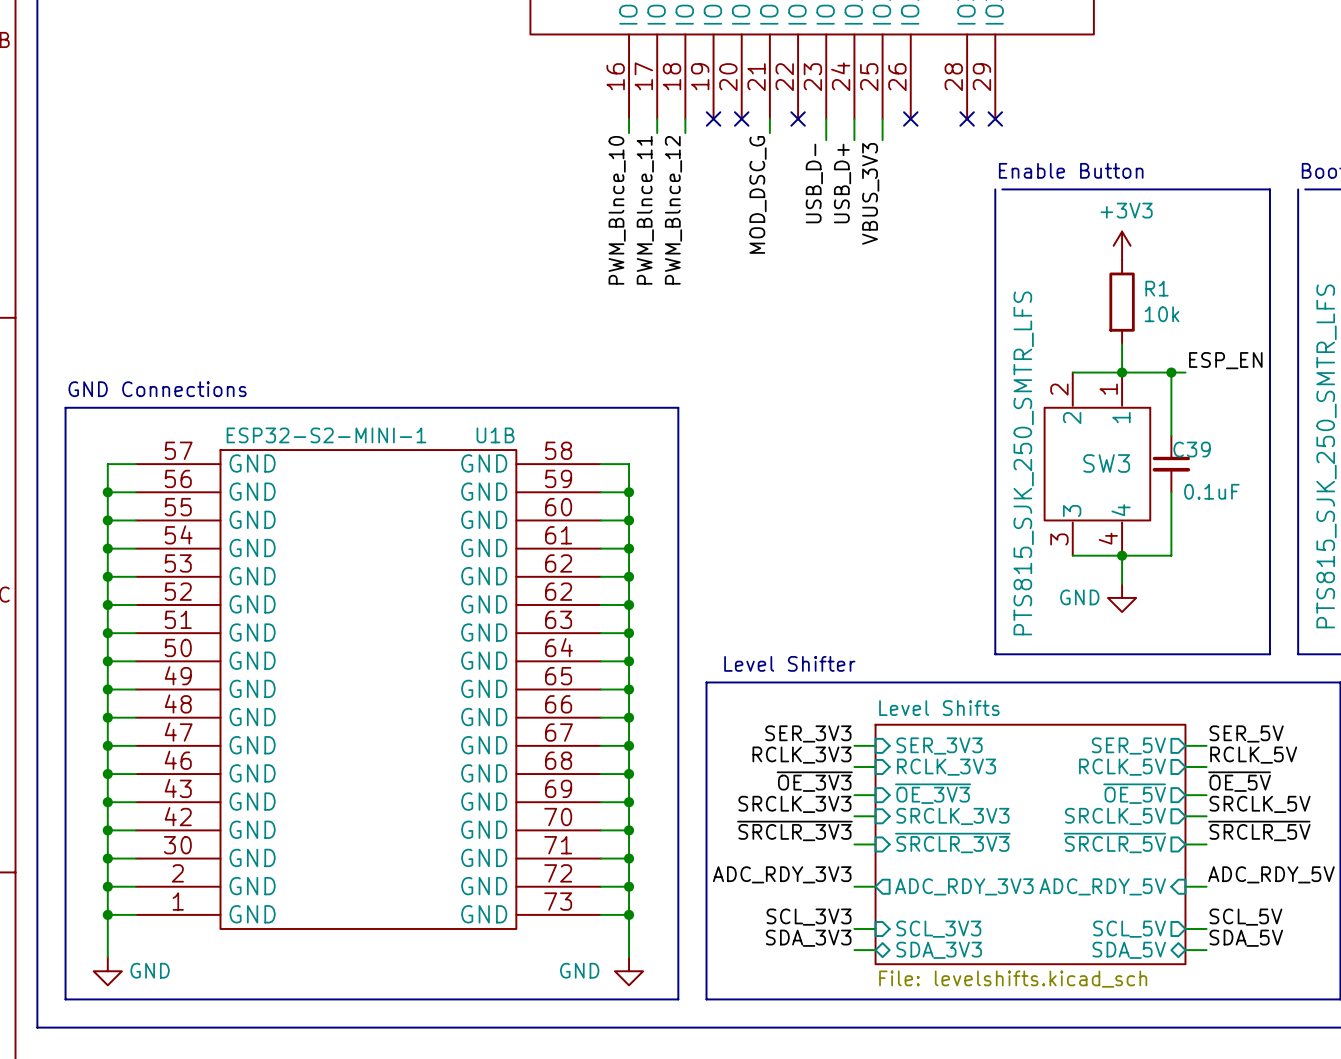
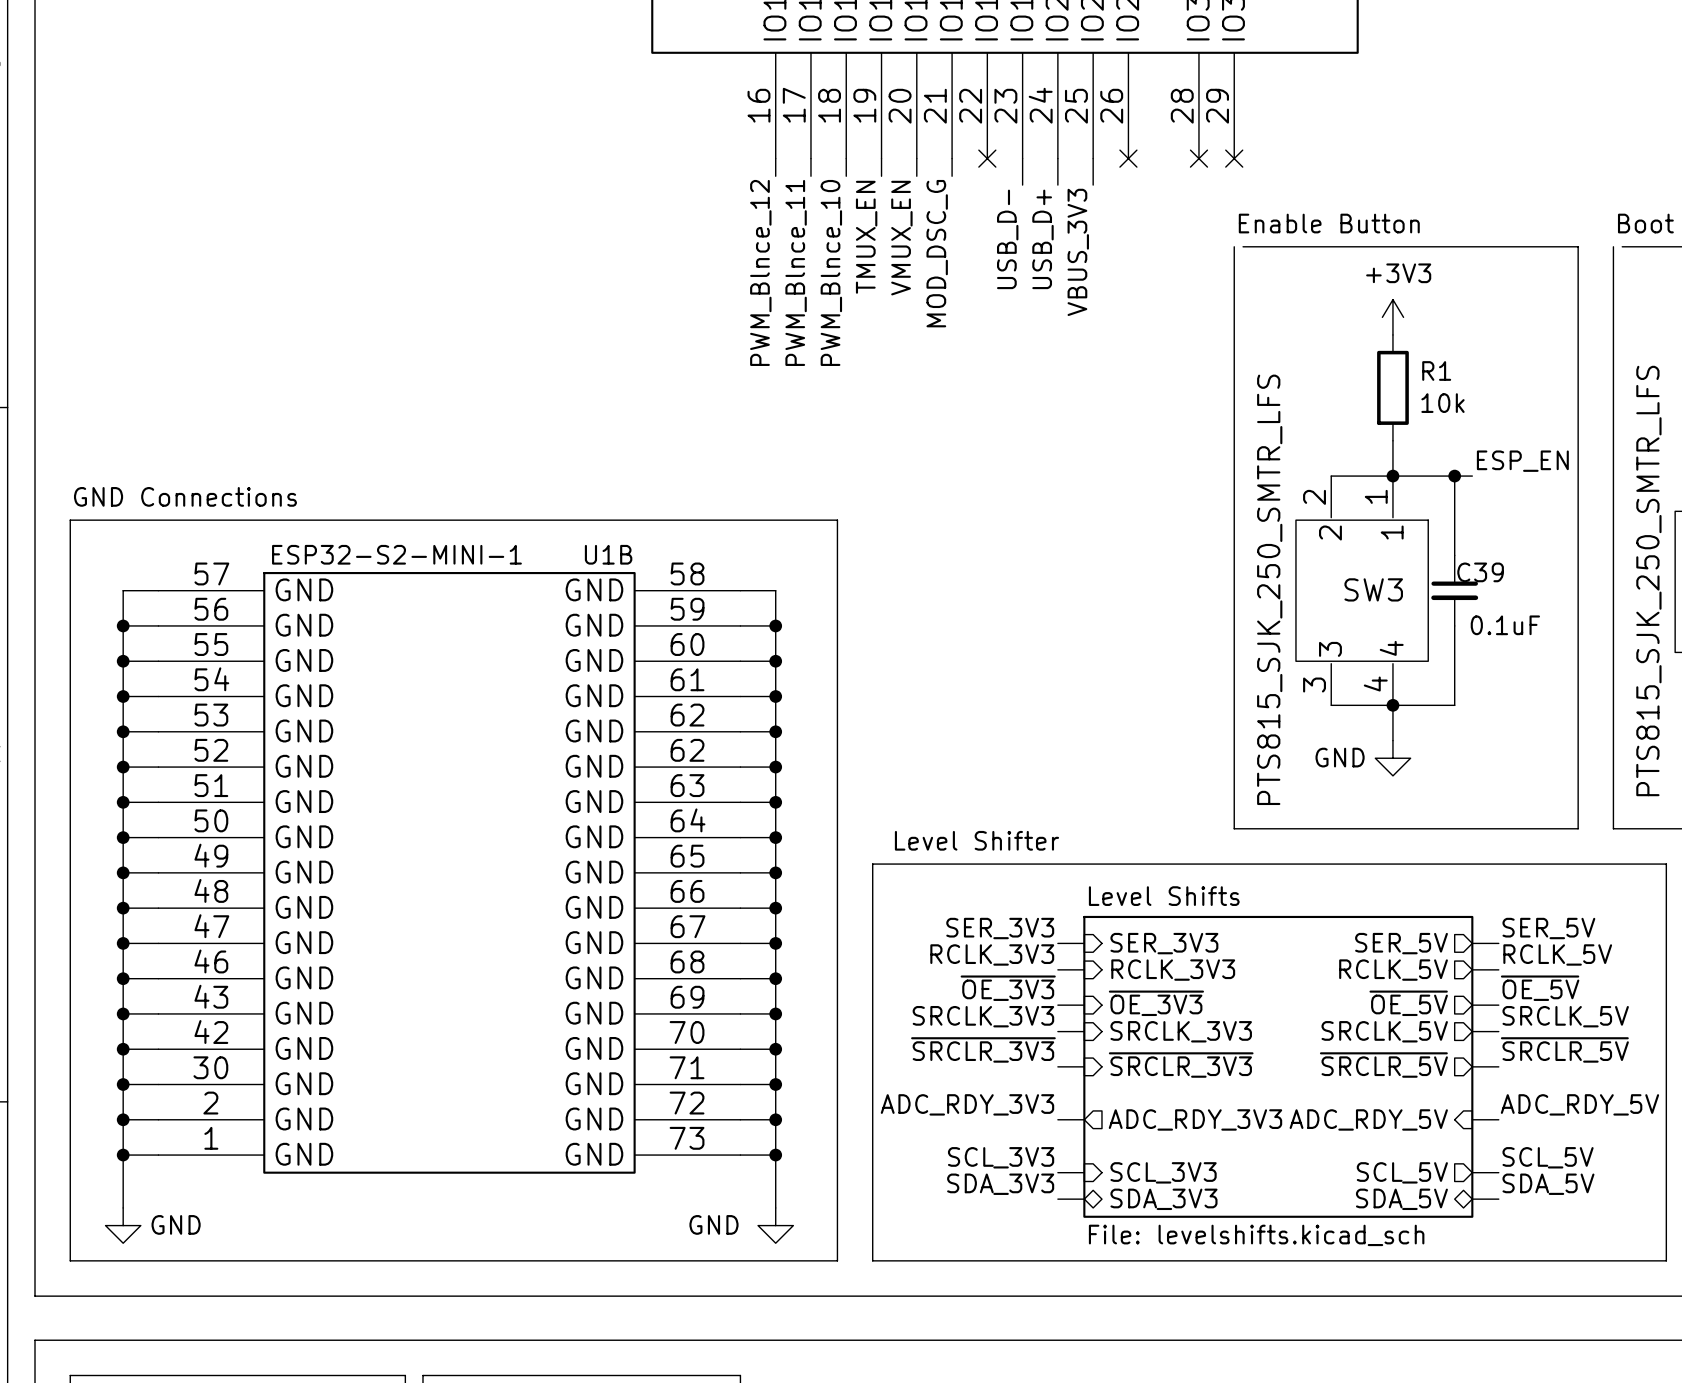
wire: none -> (881, 158) (881, 176)
no-connect mark: (713, 118) -> none
wire: none -> (916, 158) (916, 176)
no-connect mark: (741, 118) -> none
label: none -> TMUX_EN (866, 237)
label: none -> VMUX_EN (901, 238)
label: PWM_Blnce_10 (617, 210) -> PWM_Blnce_12 (760, 272)
label: PWM_Blnce_12 (673, 210) -> PWM_Blnce_10 (831, 272)

